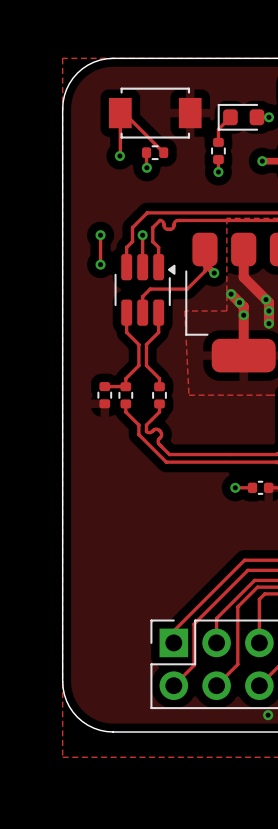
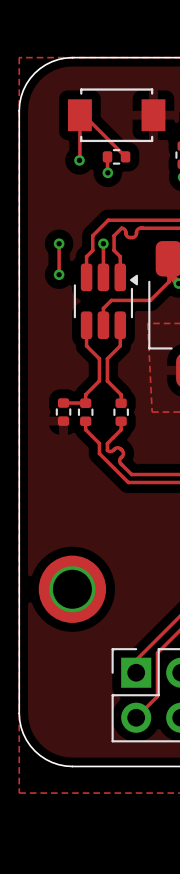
part: none -> (72, 589)

